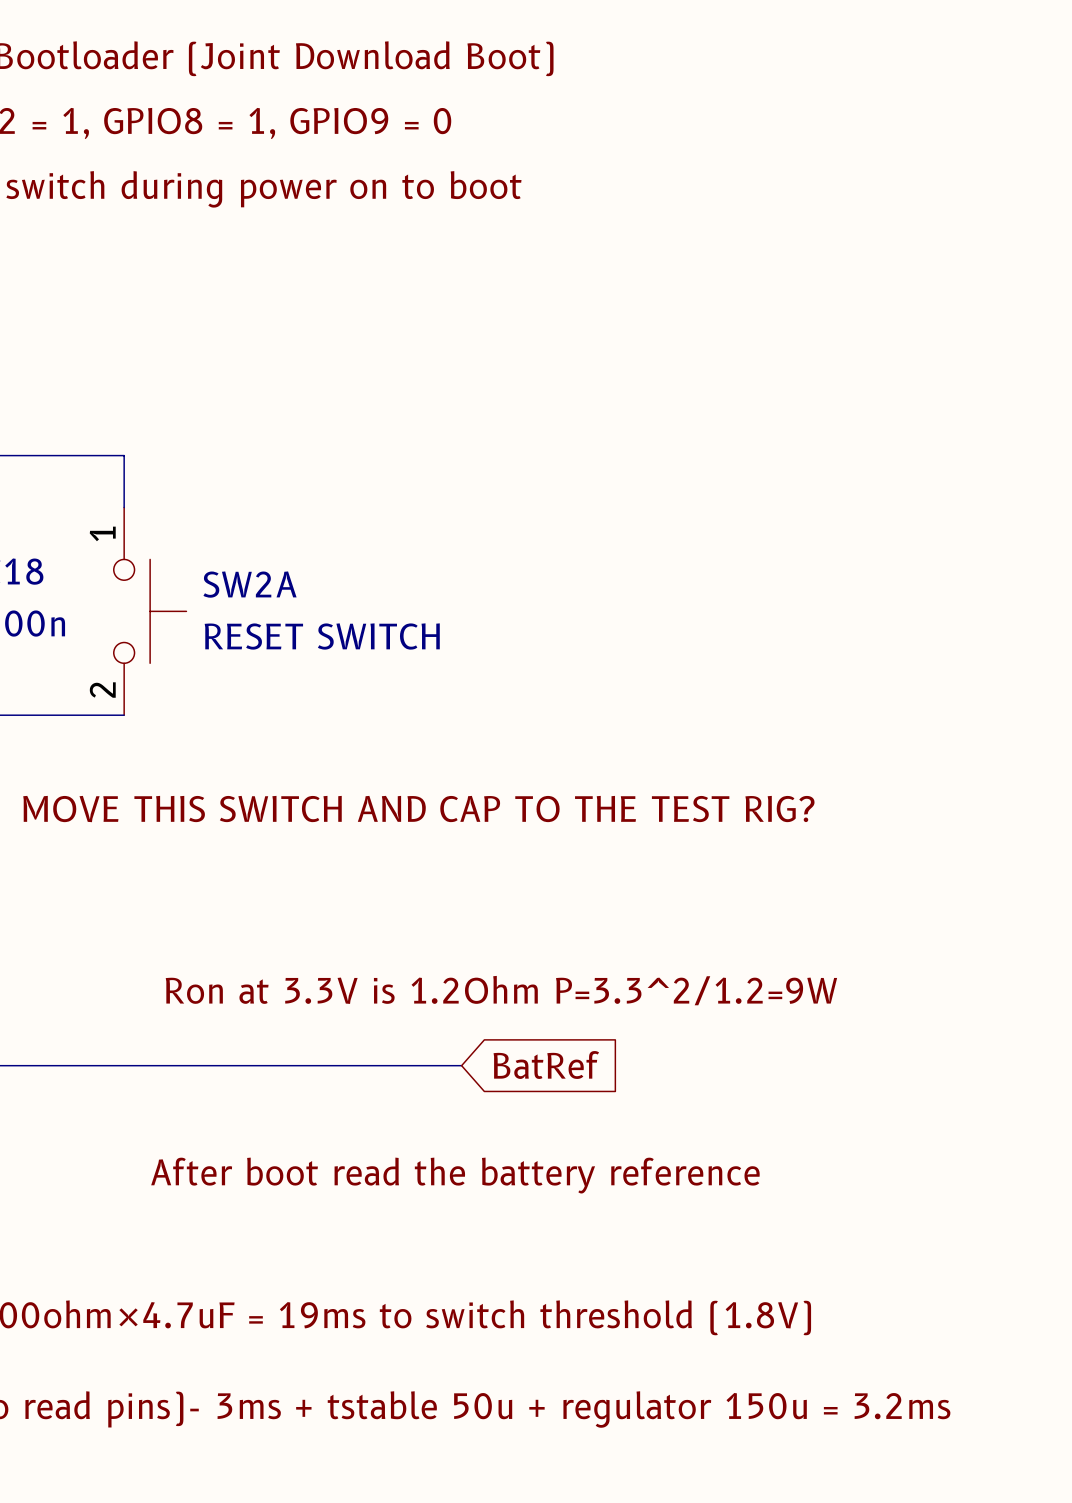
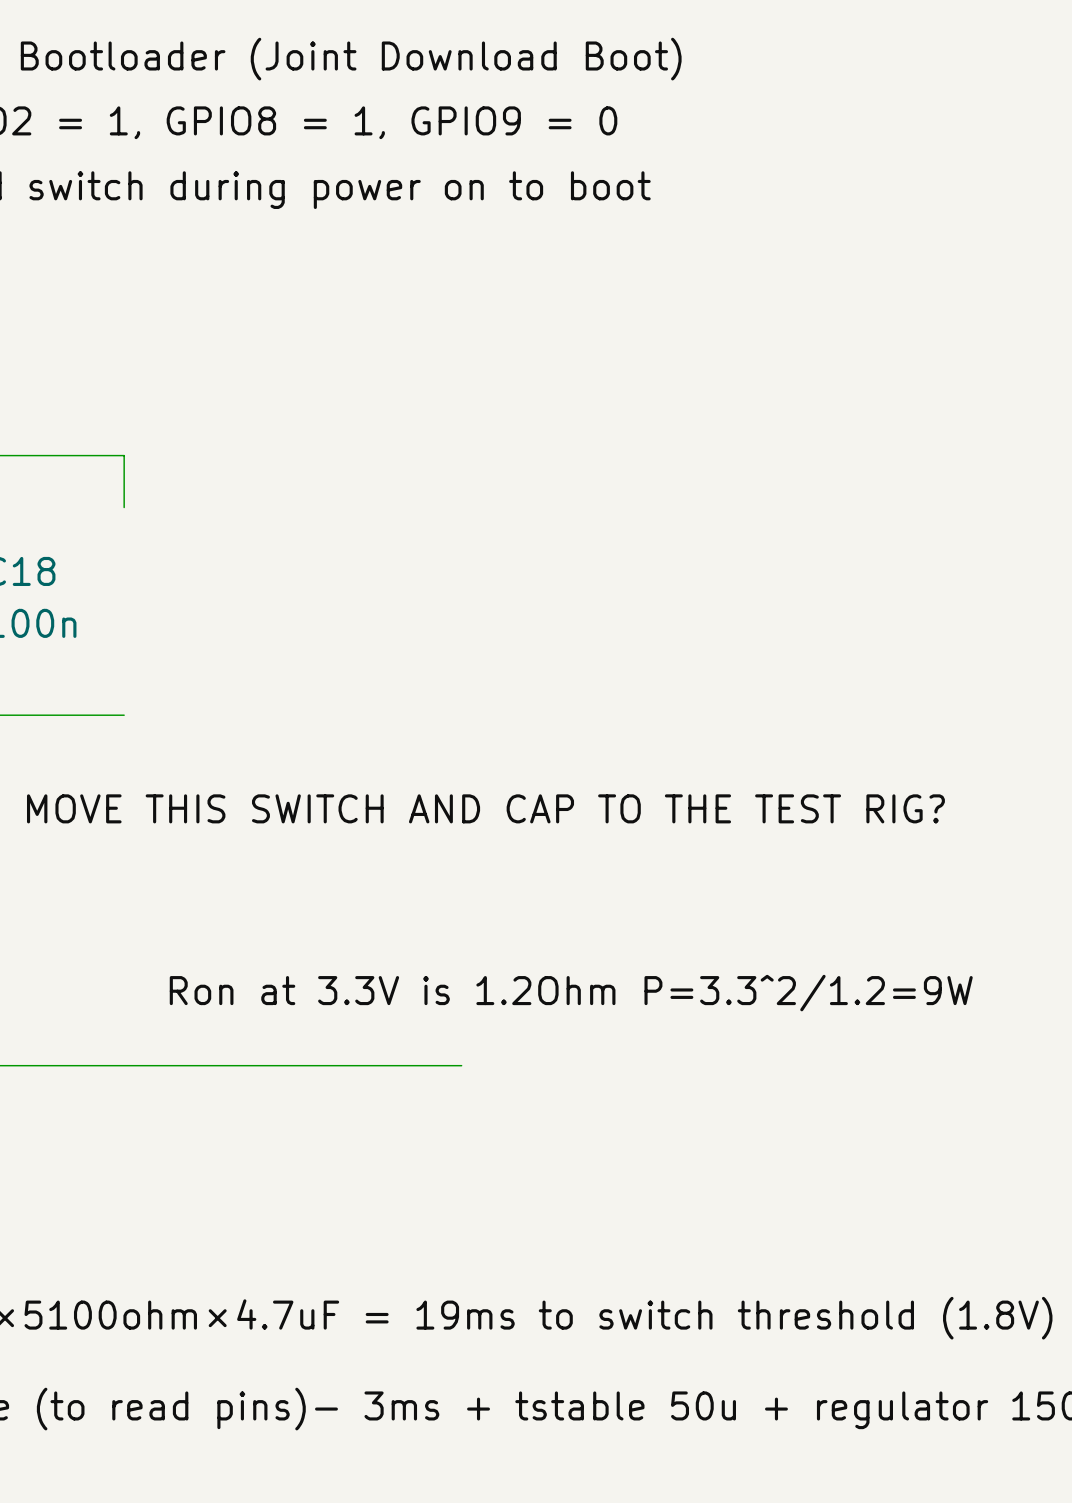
SW2A: RESET SWITCH (150, 611) -> none
global label: BatRef (546, 1064) -> none
label: After boot read the battery reference (455, 1175) -> none

